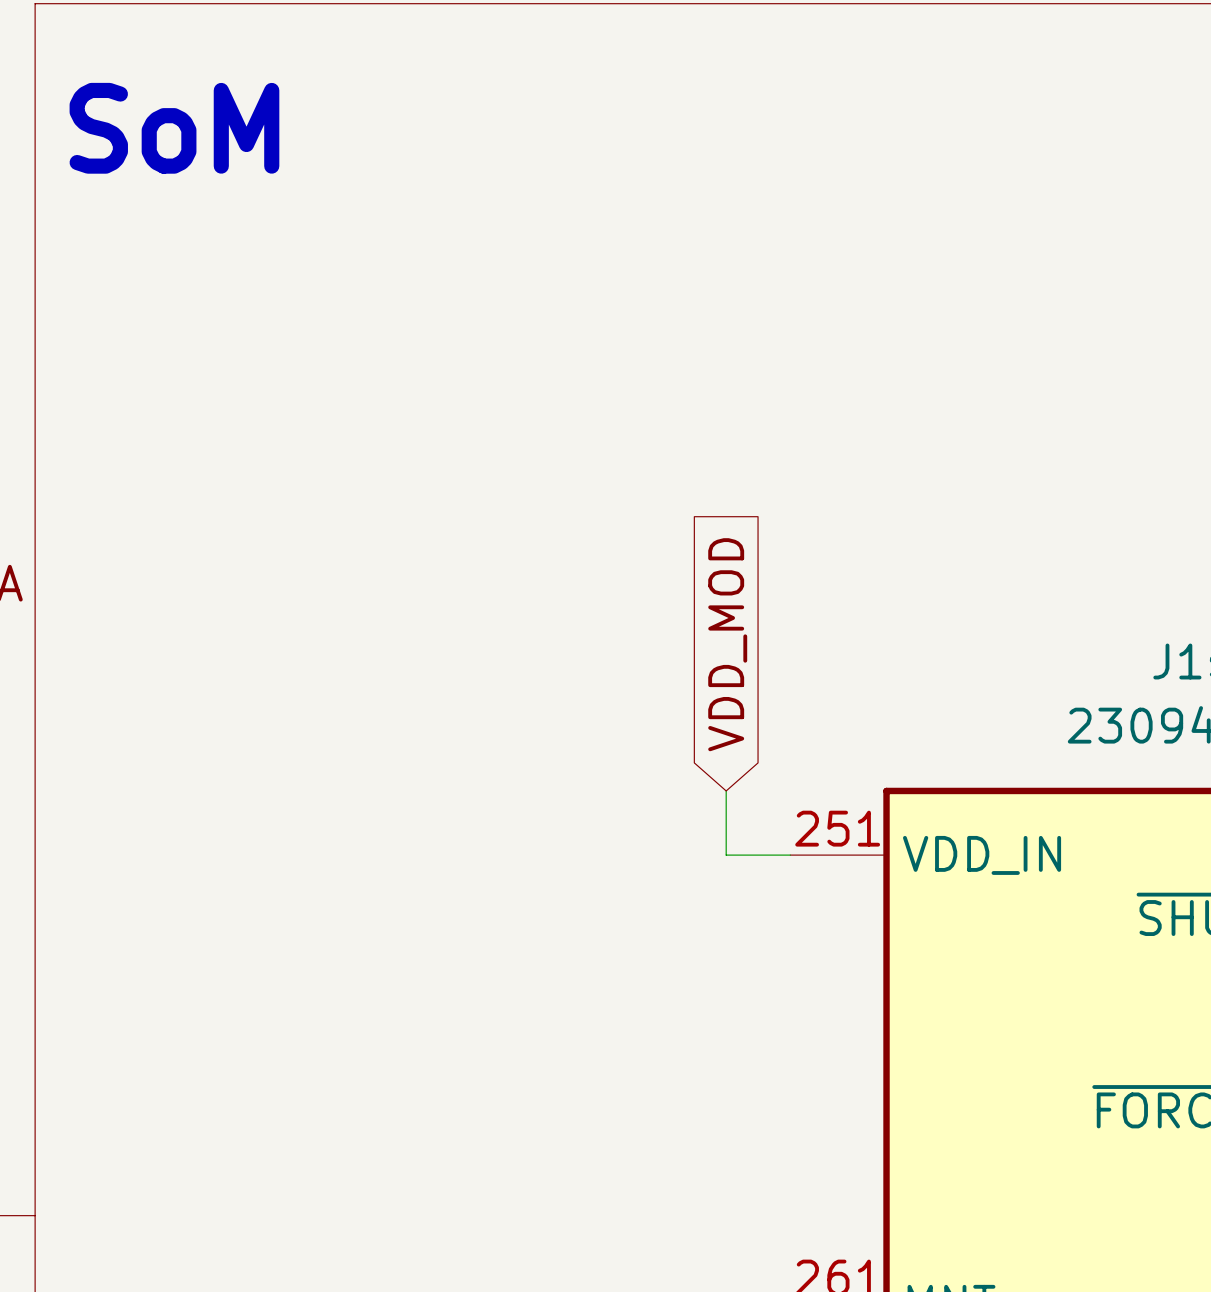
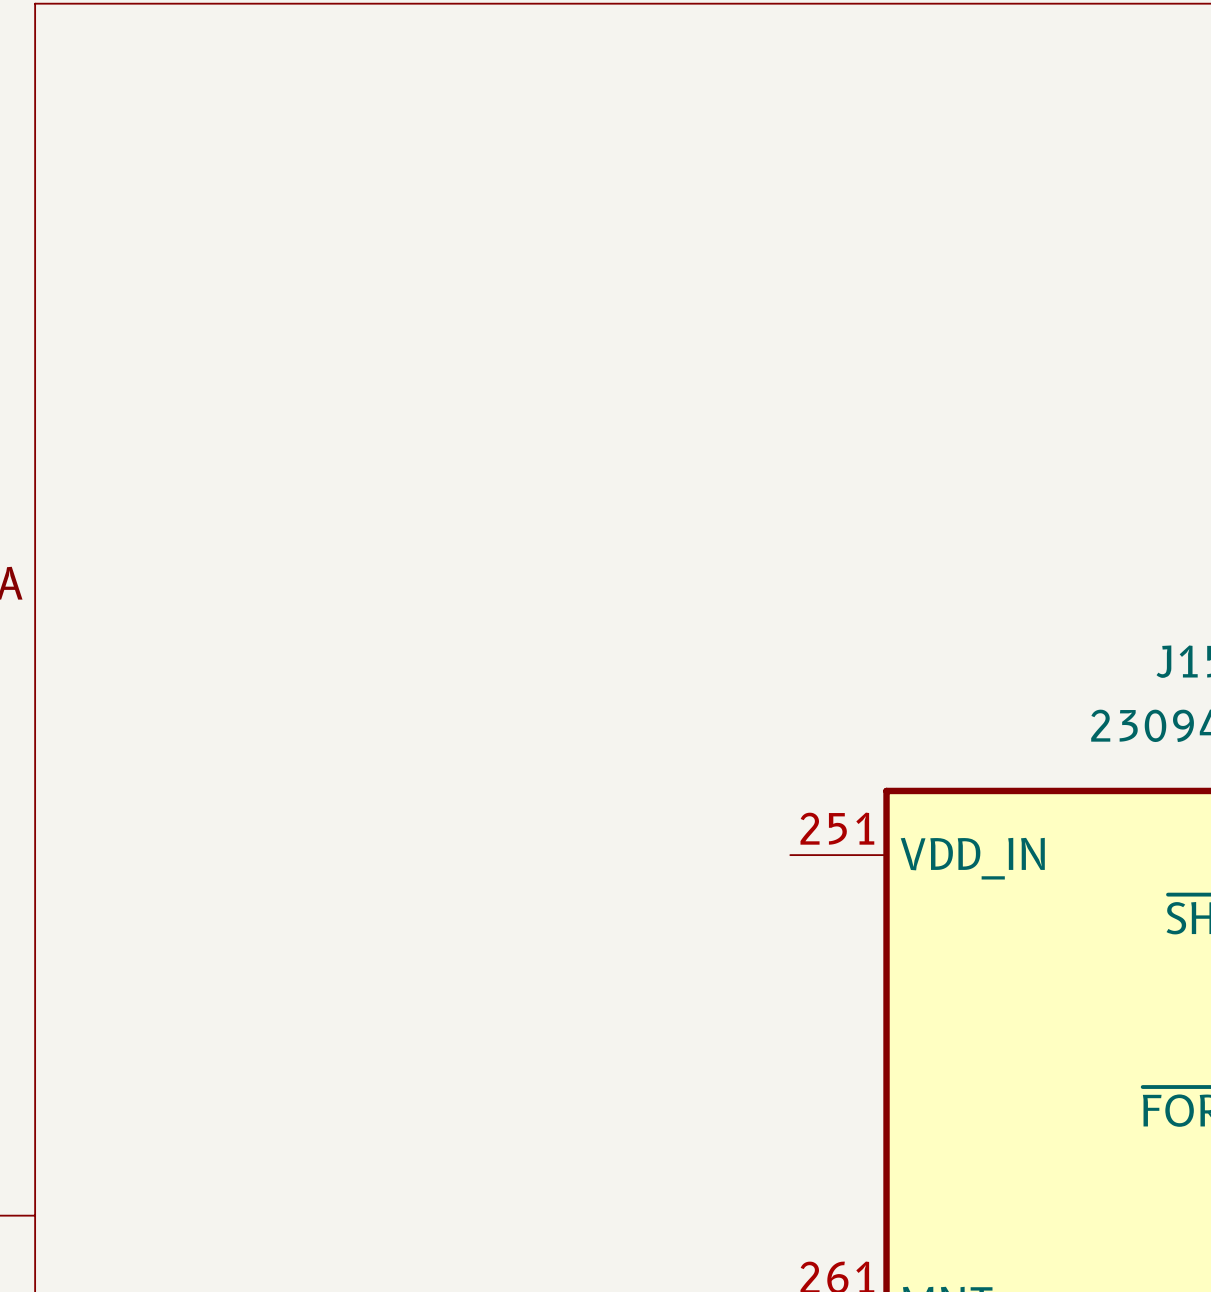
text: SoM (174, 128) -> none
global label: VDD_MOD (727, 644) -> none
wire: (726, 790) (726, 855) (790, 855) -> none

